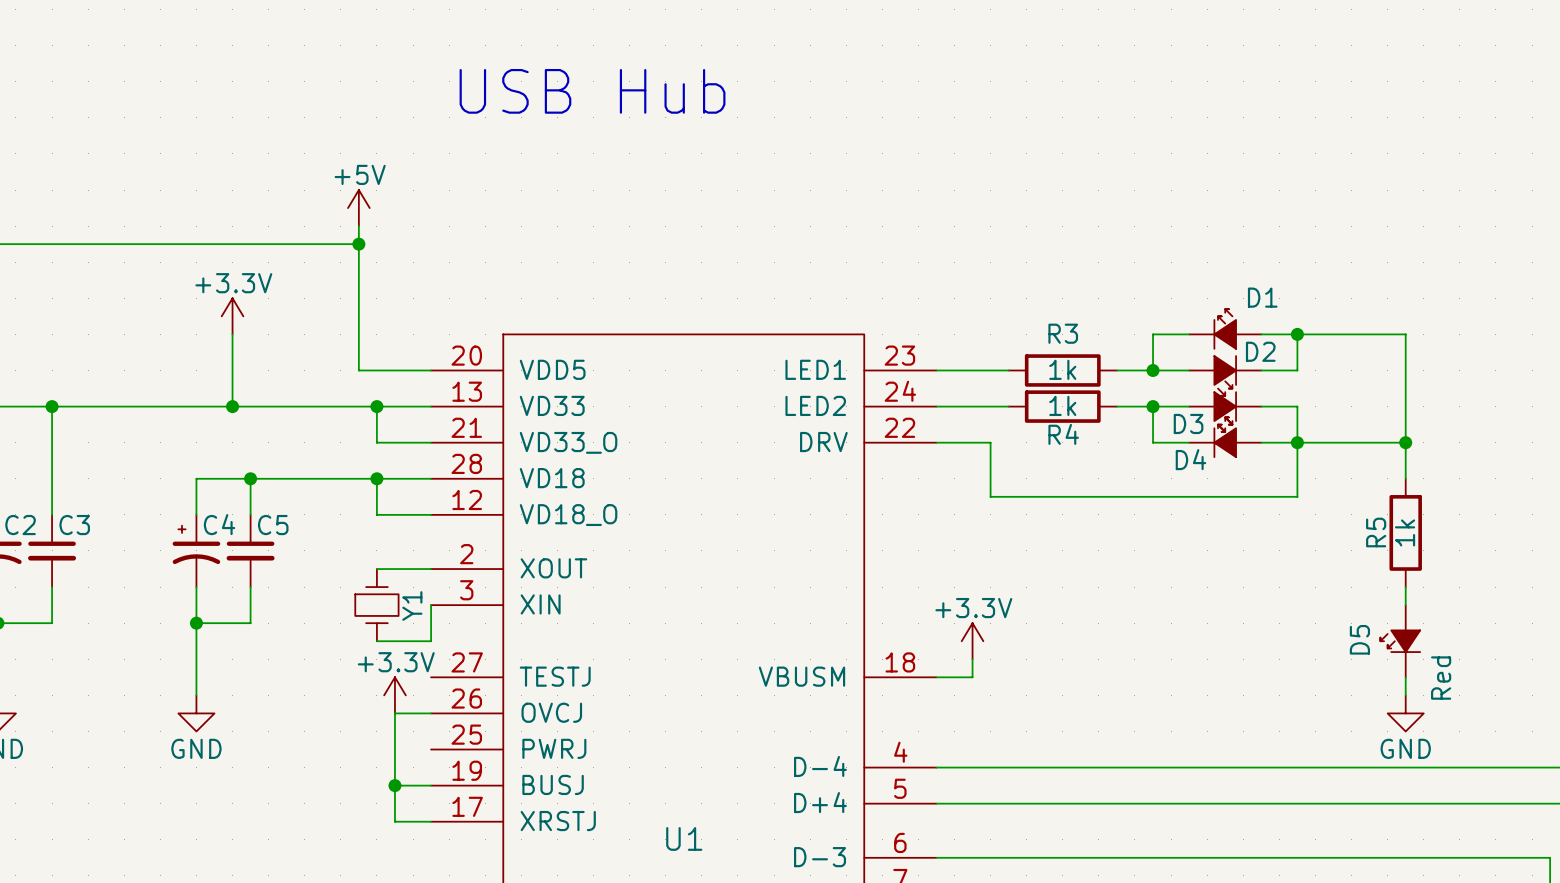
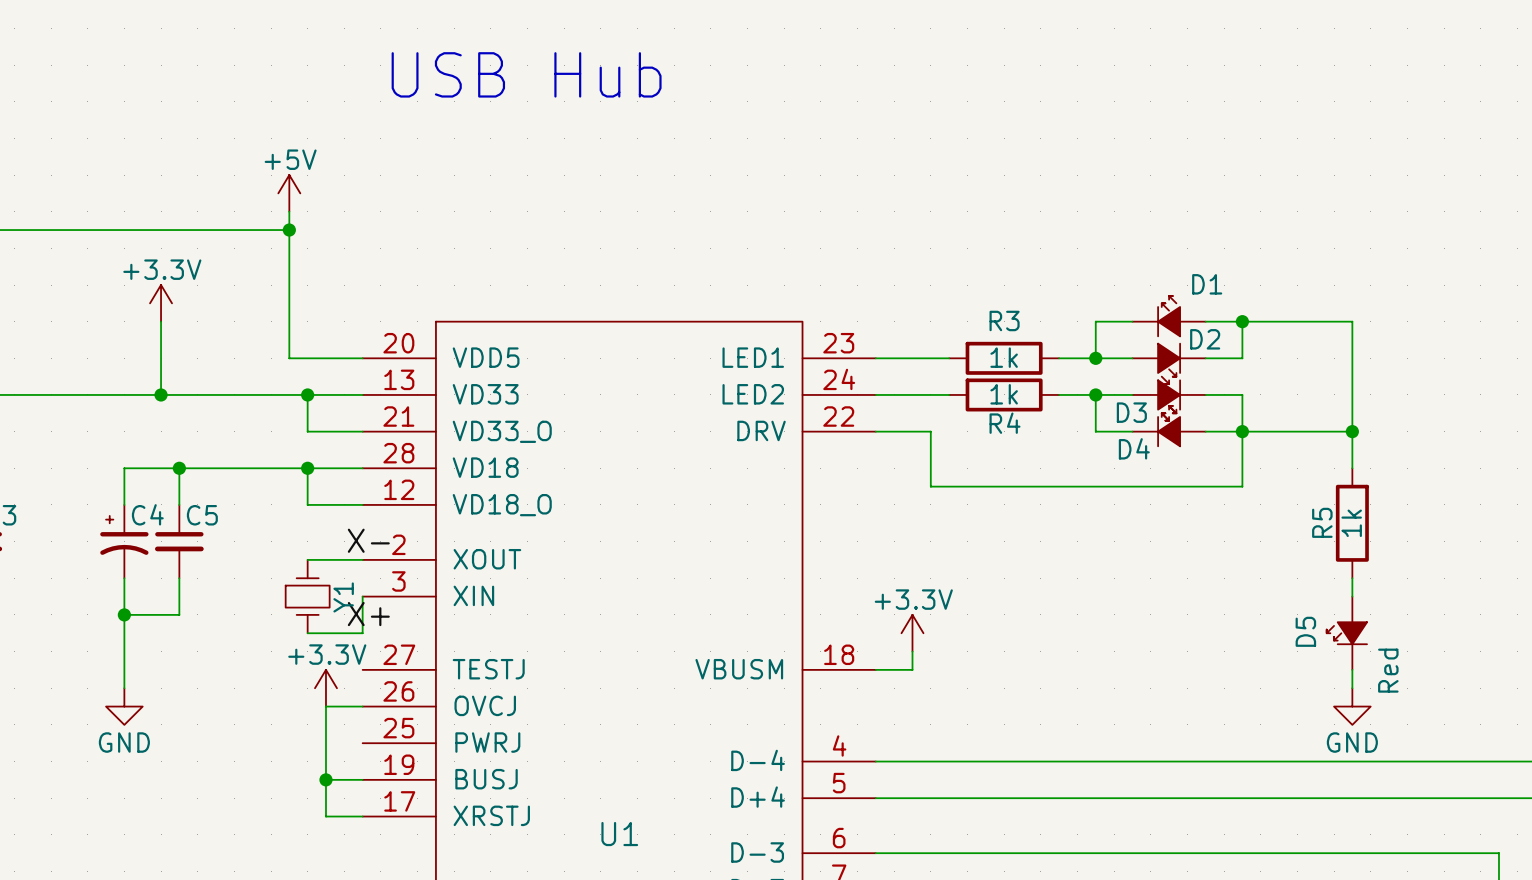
label: none -> X- (368, 540)
label: none -> X+ (368, 614)

